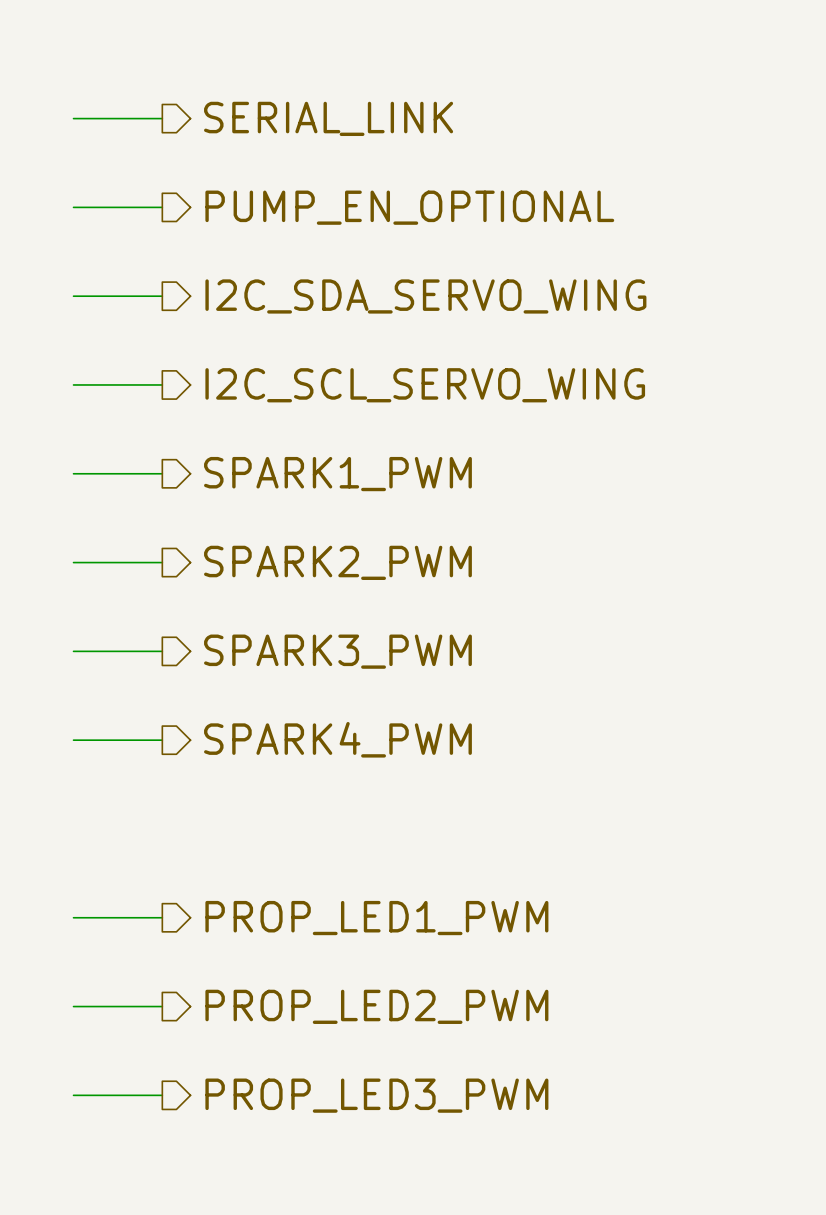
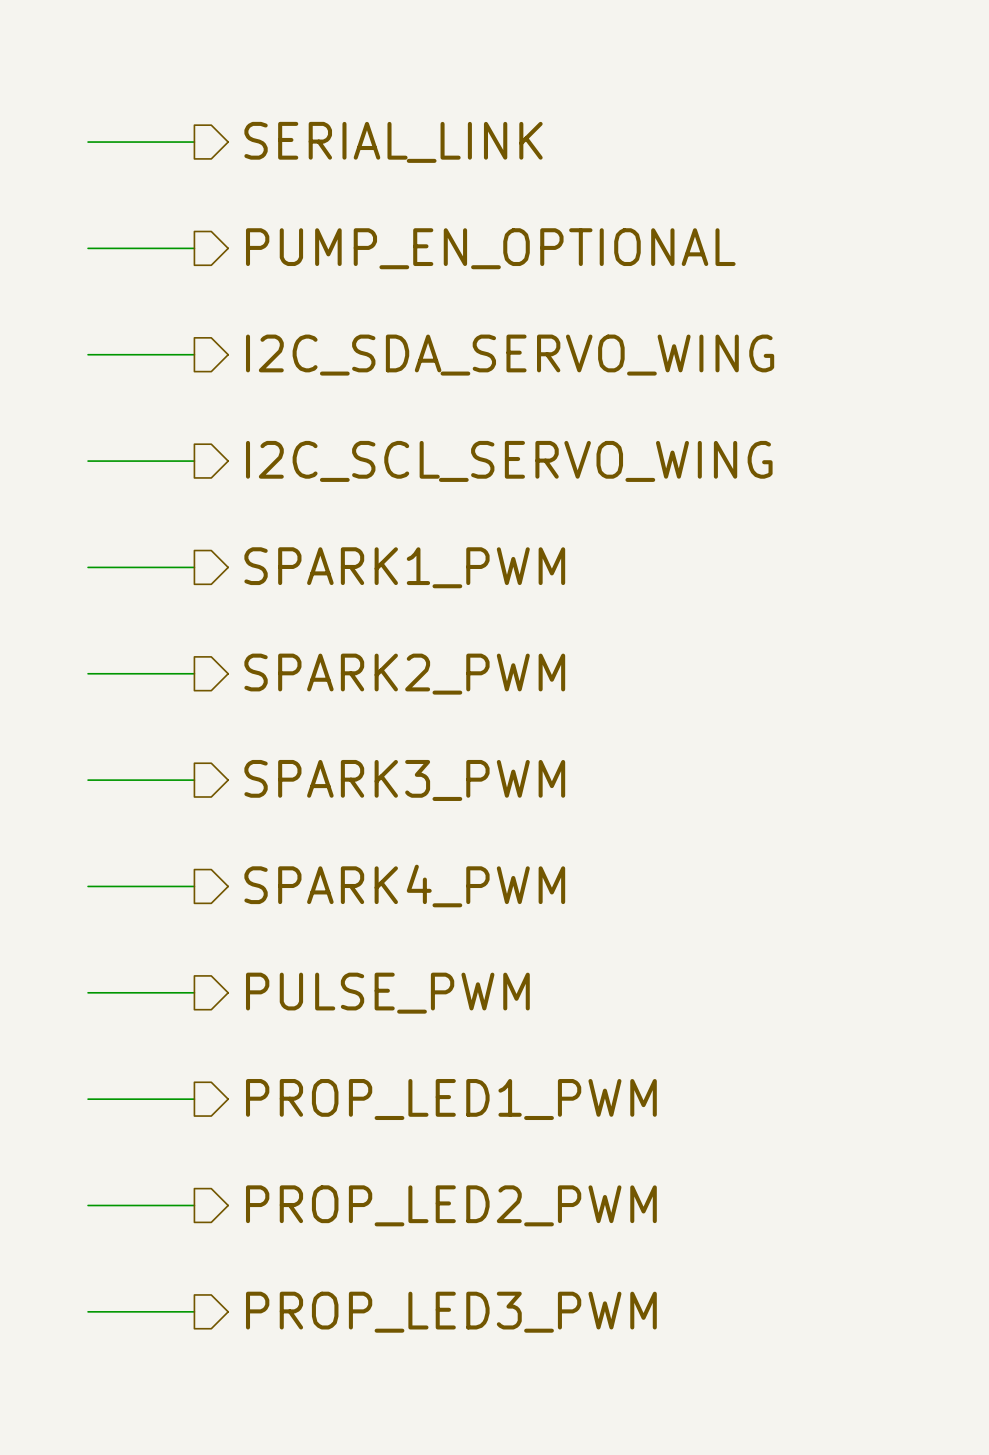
wire: none -> (88, 992) (194, 992)
hierarchical label: none -> PULSE_PWM (387, 993)

